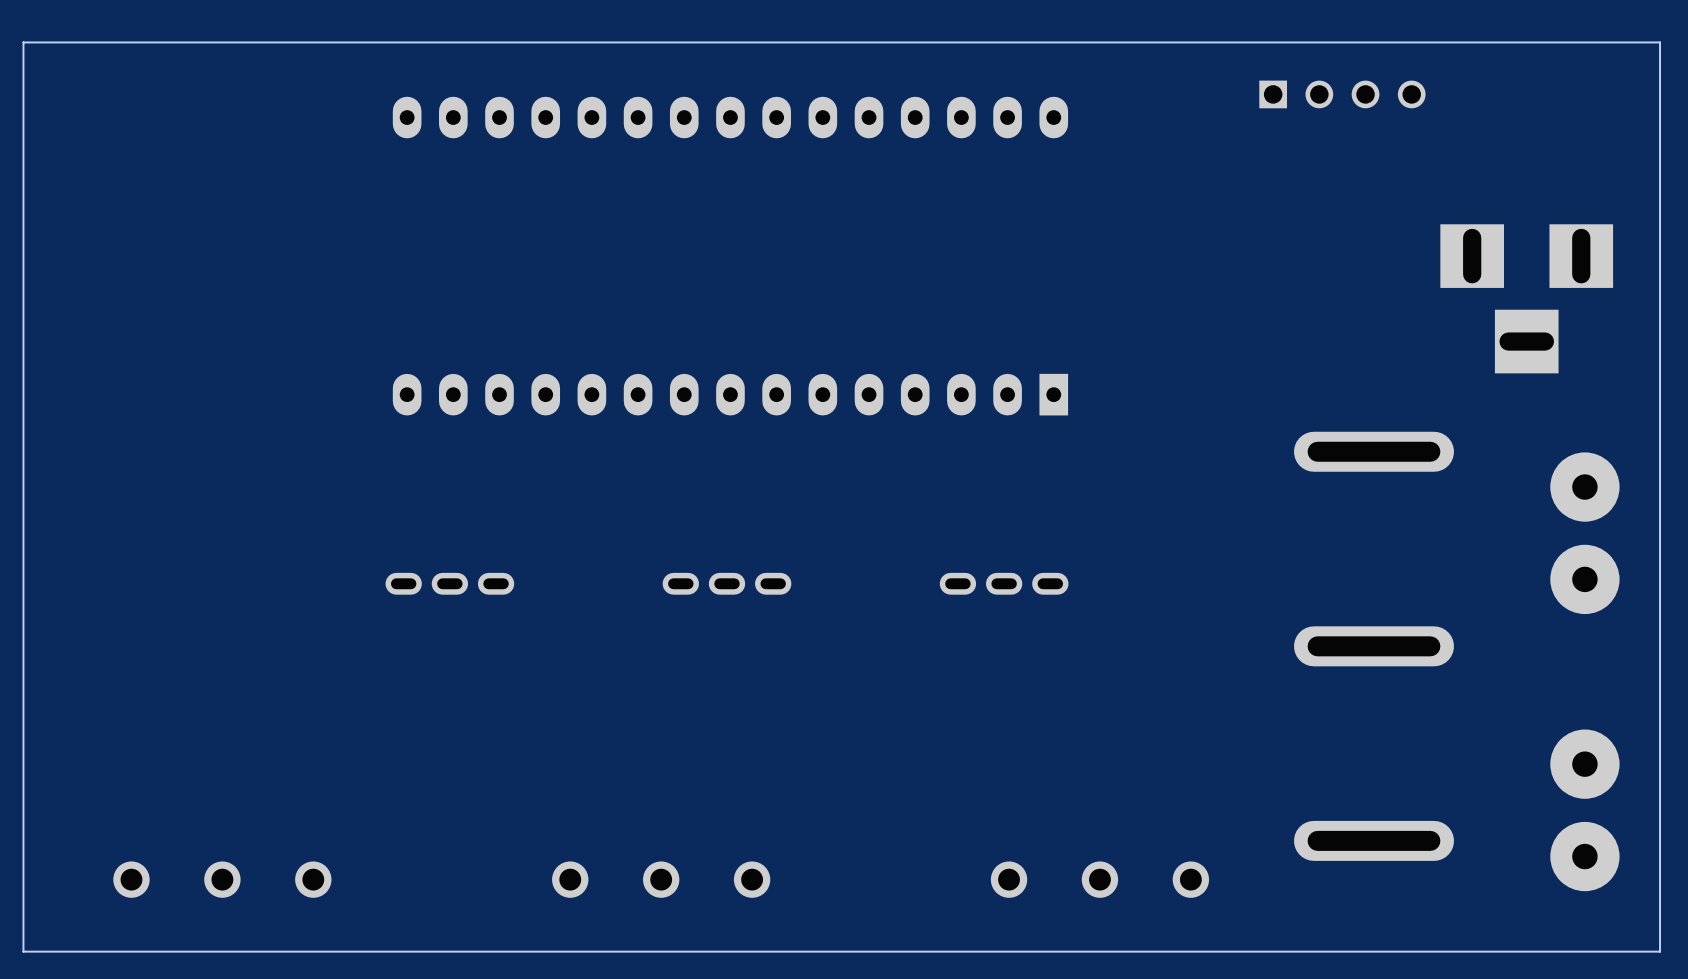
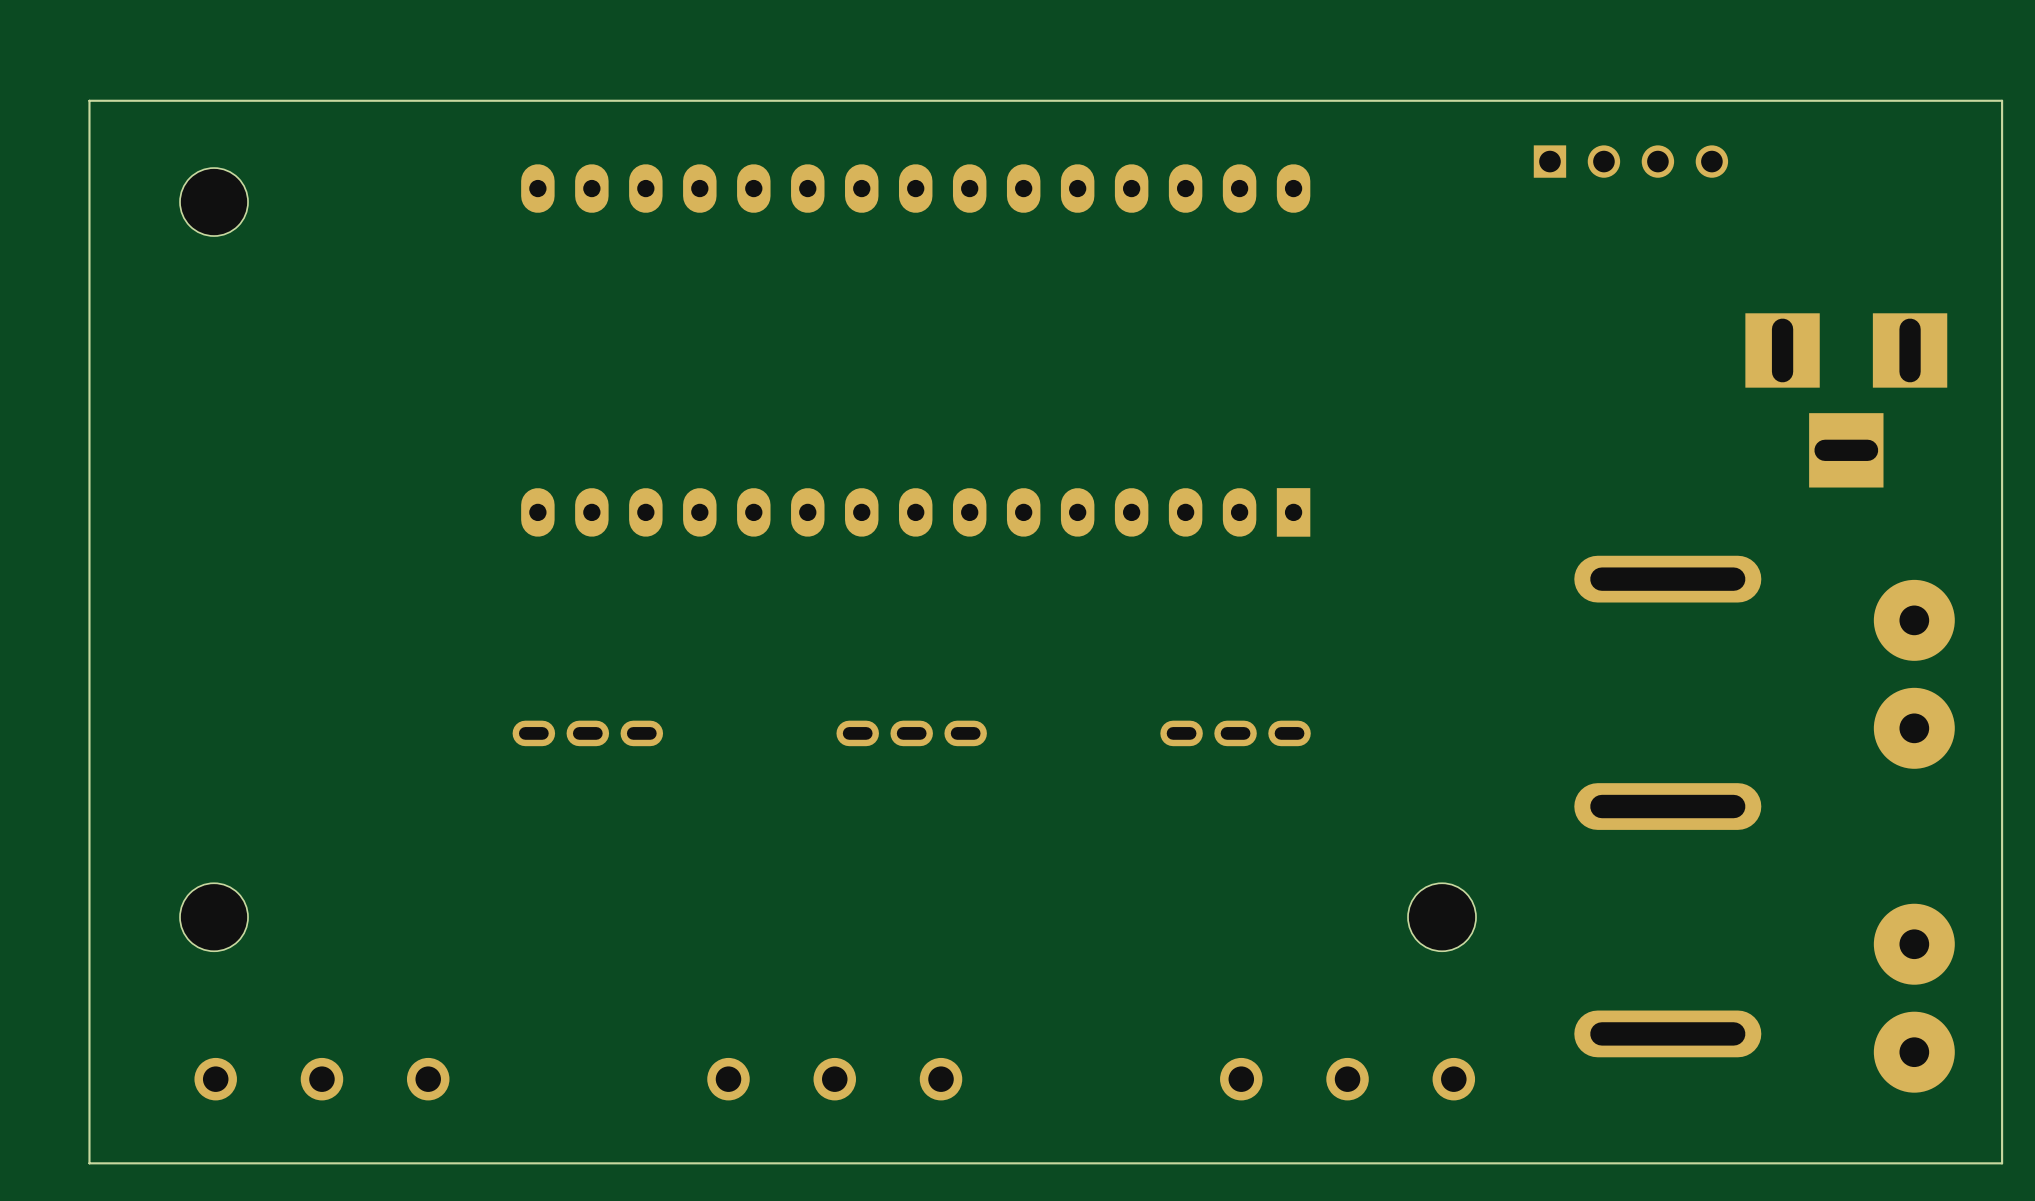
part: none -> (214, 202)
part: none -> (214, 917)
part: none -> (1442, 917)

